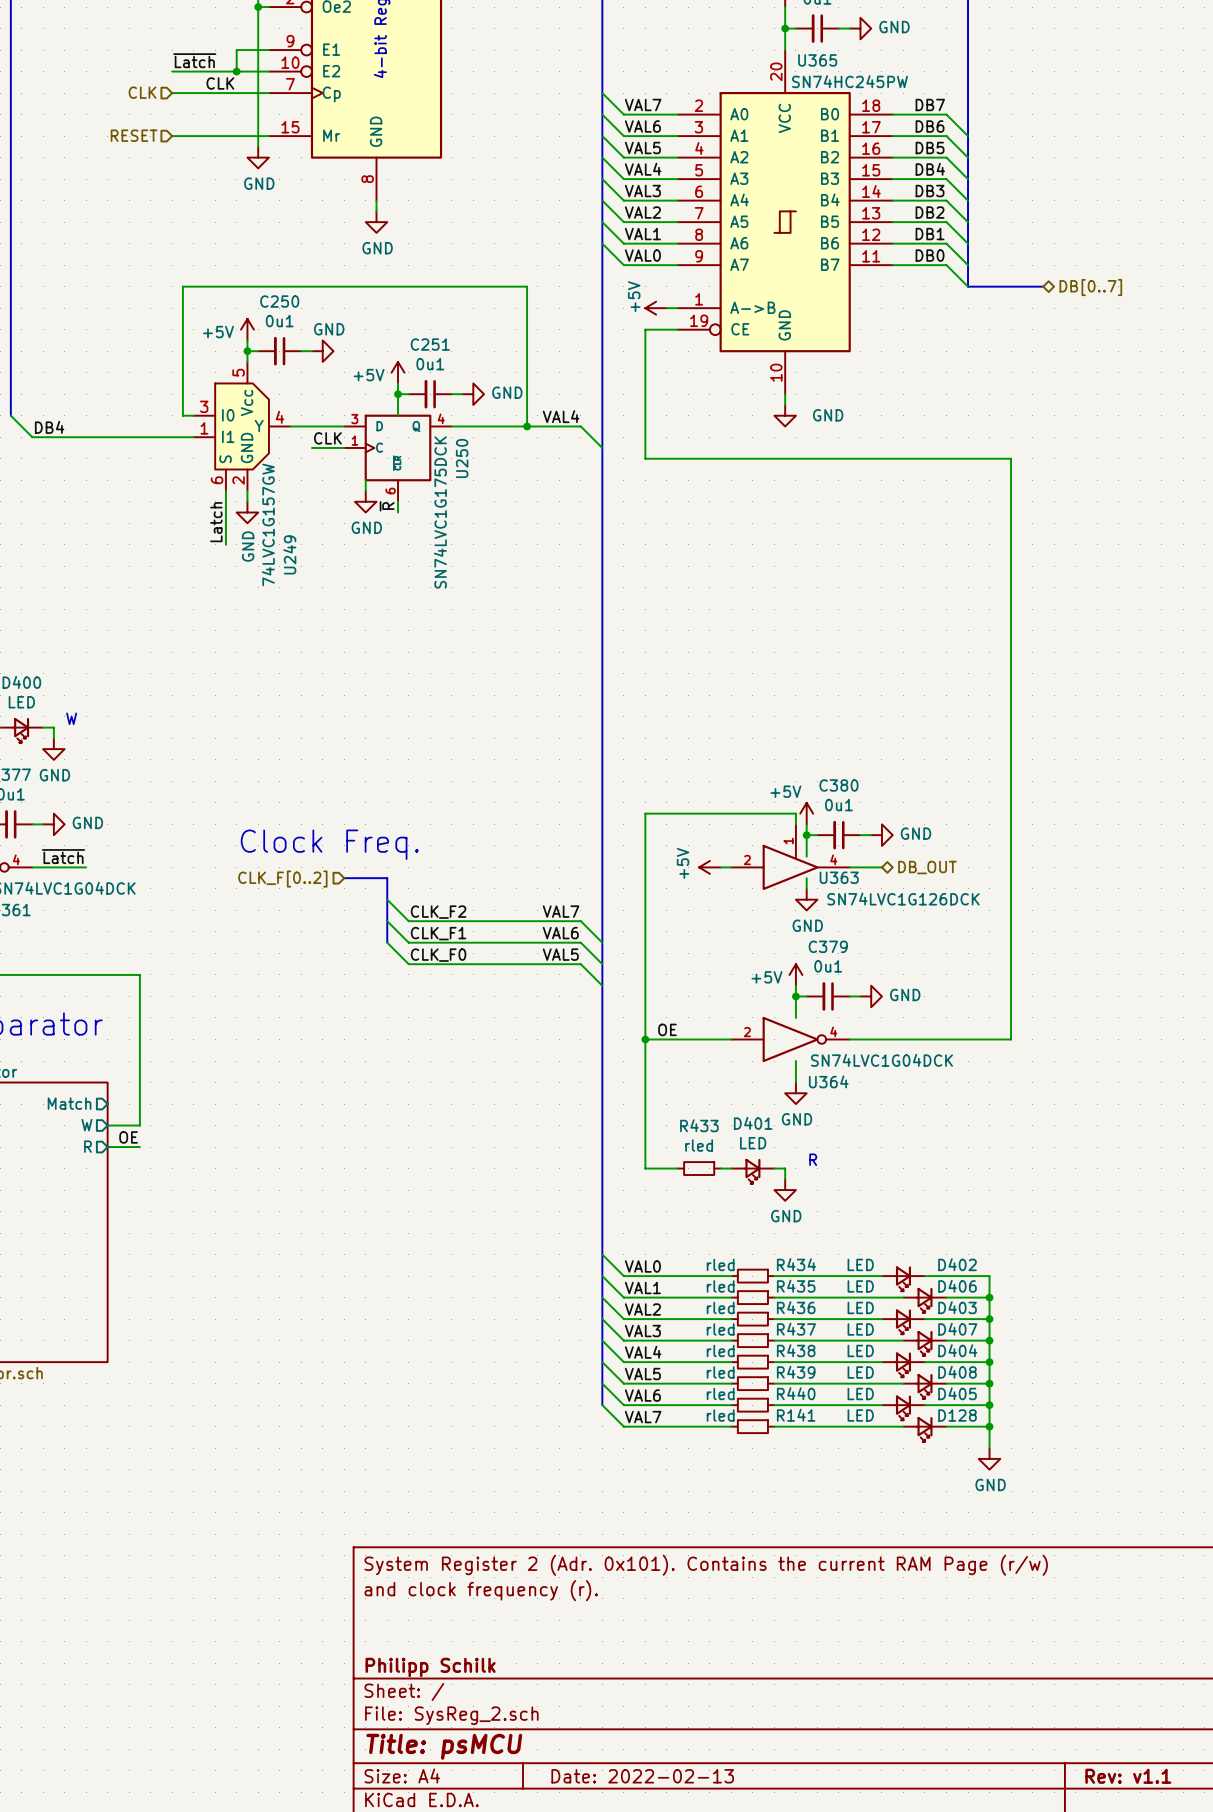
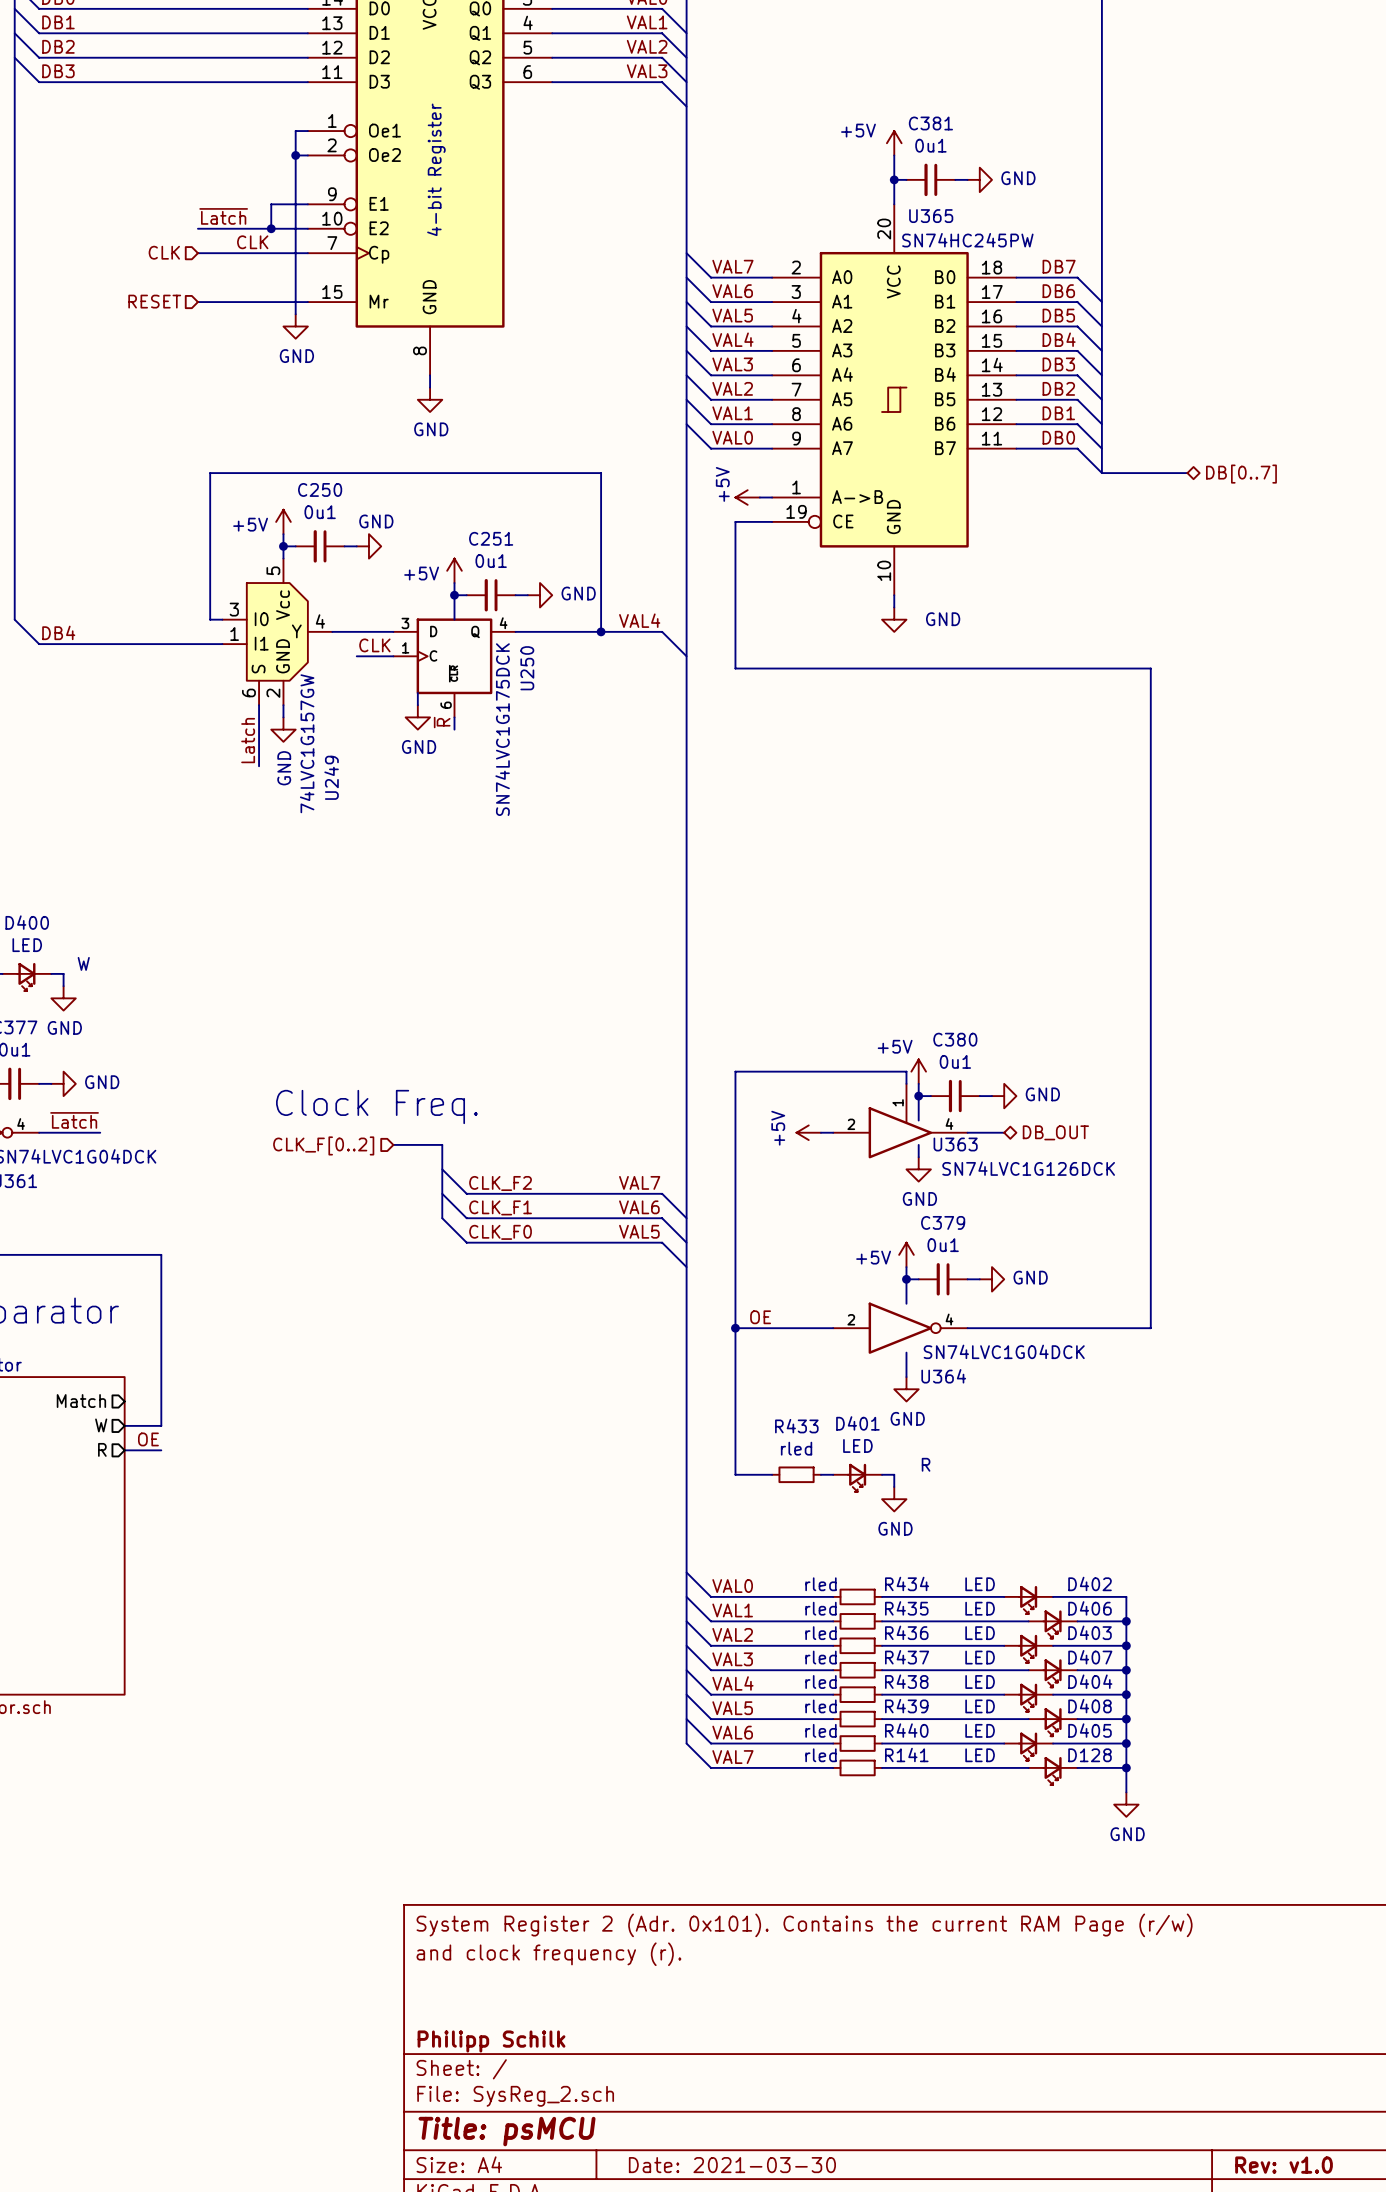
title block: Date: 2022-02-13 (642, 1776) -> Date: 2021-03-30 (732, 2165)
title block: Rev: v1.1 (1128, 1776) -> Rev: v1.0 (1284, 2165)

